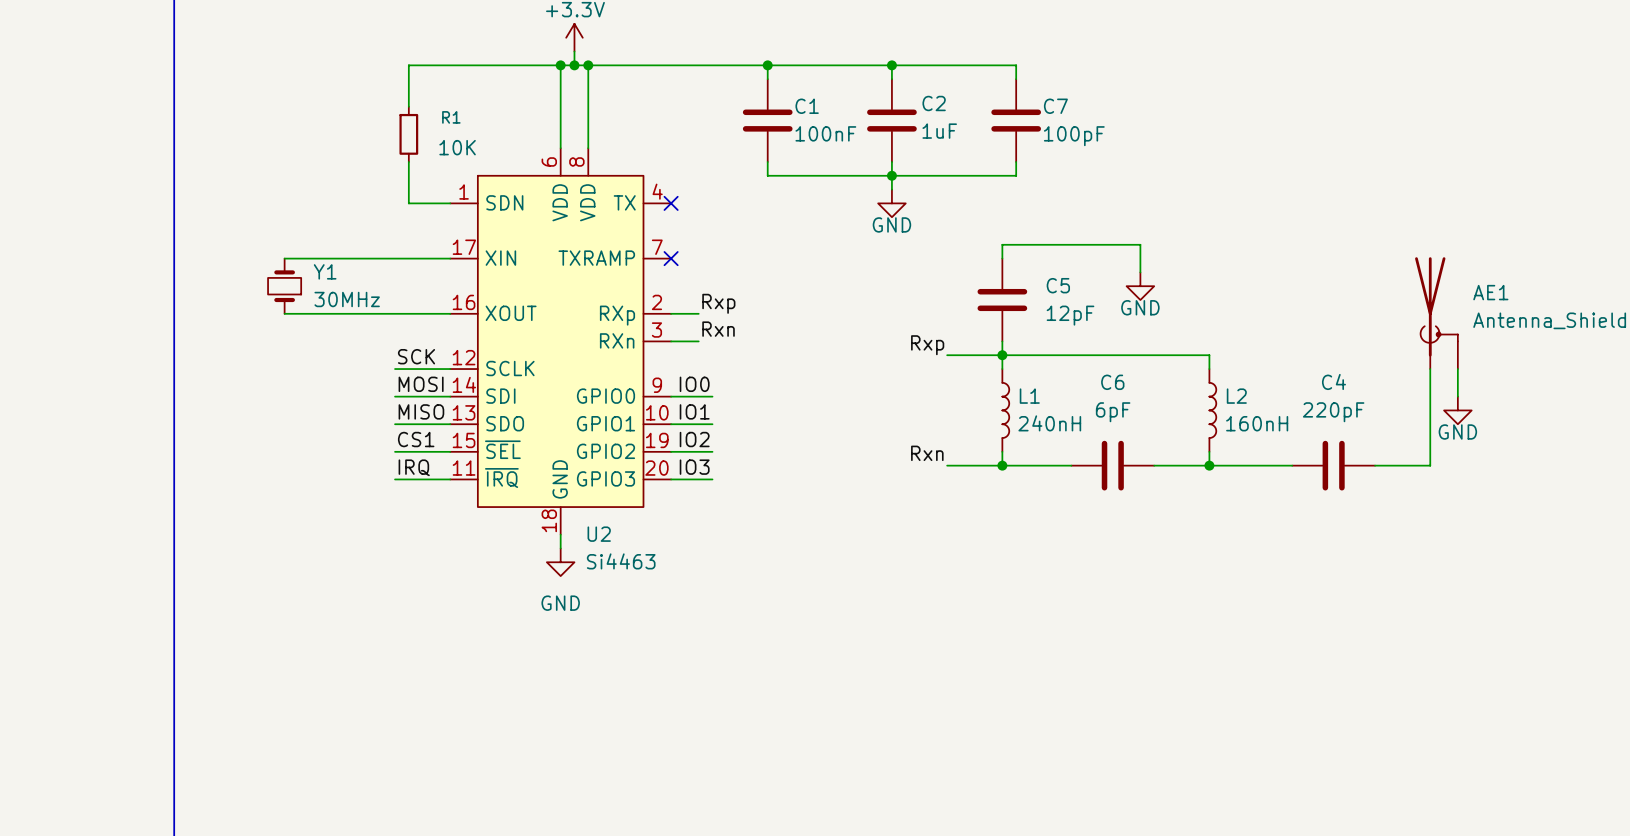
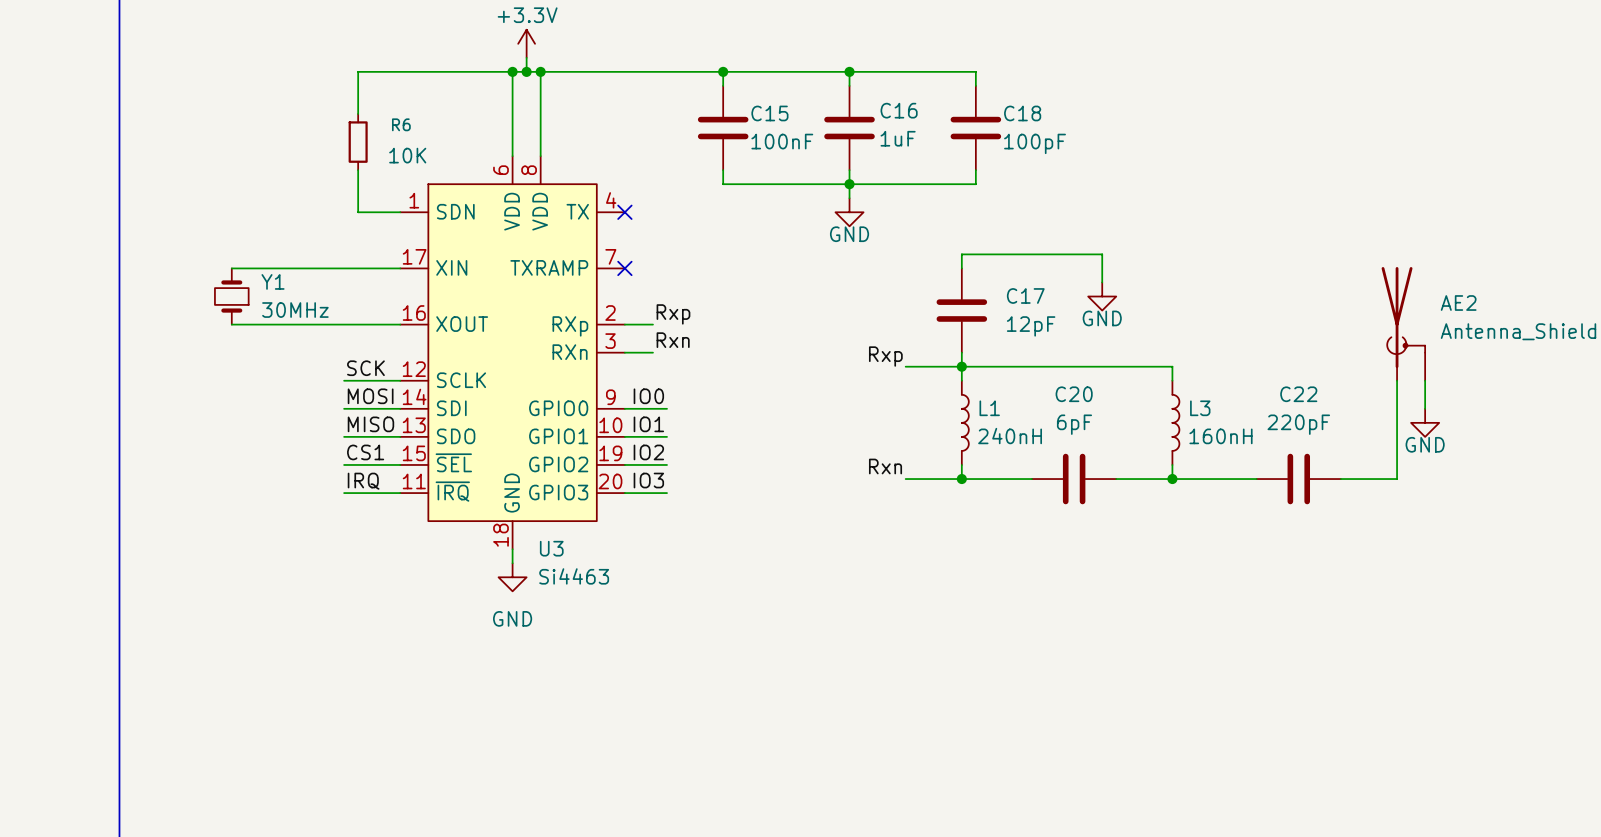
C2 name: C2 (934, 103) -> C16 (899, 110)
C1 name: C1 (807, 106) -> C15 (769, 113)
C7 name: C7 (1055, 106) -> C18 (1022, 113)
R1 name: R1 (451, 117) -> R6 (401, 124)
C5 name: C5 (1058, 285) -> C17 (1025, 295)
AE1 name: AE1 (1490, 292) -> AE2 (1458, 303)
C4 name: C4 (1333, 381) -> C22 (1298, 394)
C6 name: C6 (1112, 382) -> C20 (1074, 394)
L2 name: L2 (1236, 396) -> L3 (1200, 408)
U2 name: U2 (599, 534) -> U3 (551, 548)

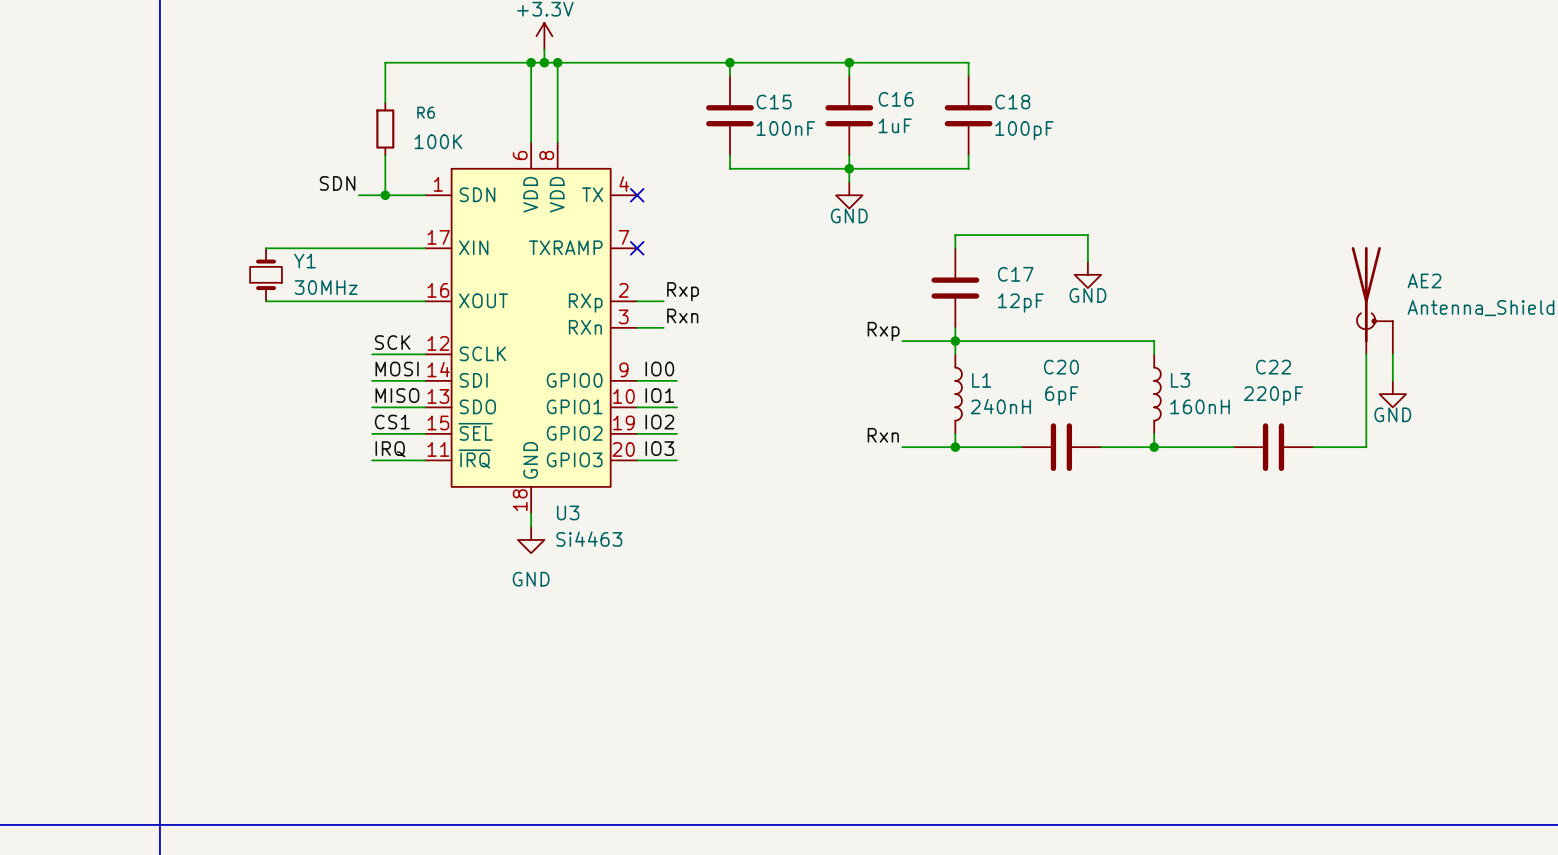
R6 value: 10K (407, 155) -> 100K (438, 141)
label: none -> SDN (337, 183)
wire: none -> (358, 195) (385, 195)
junction: none -> (385, 195)

